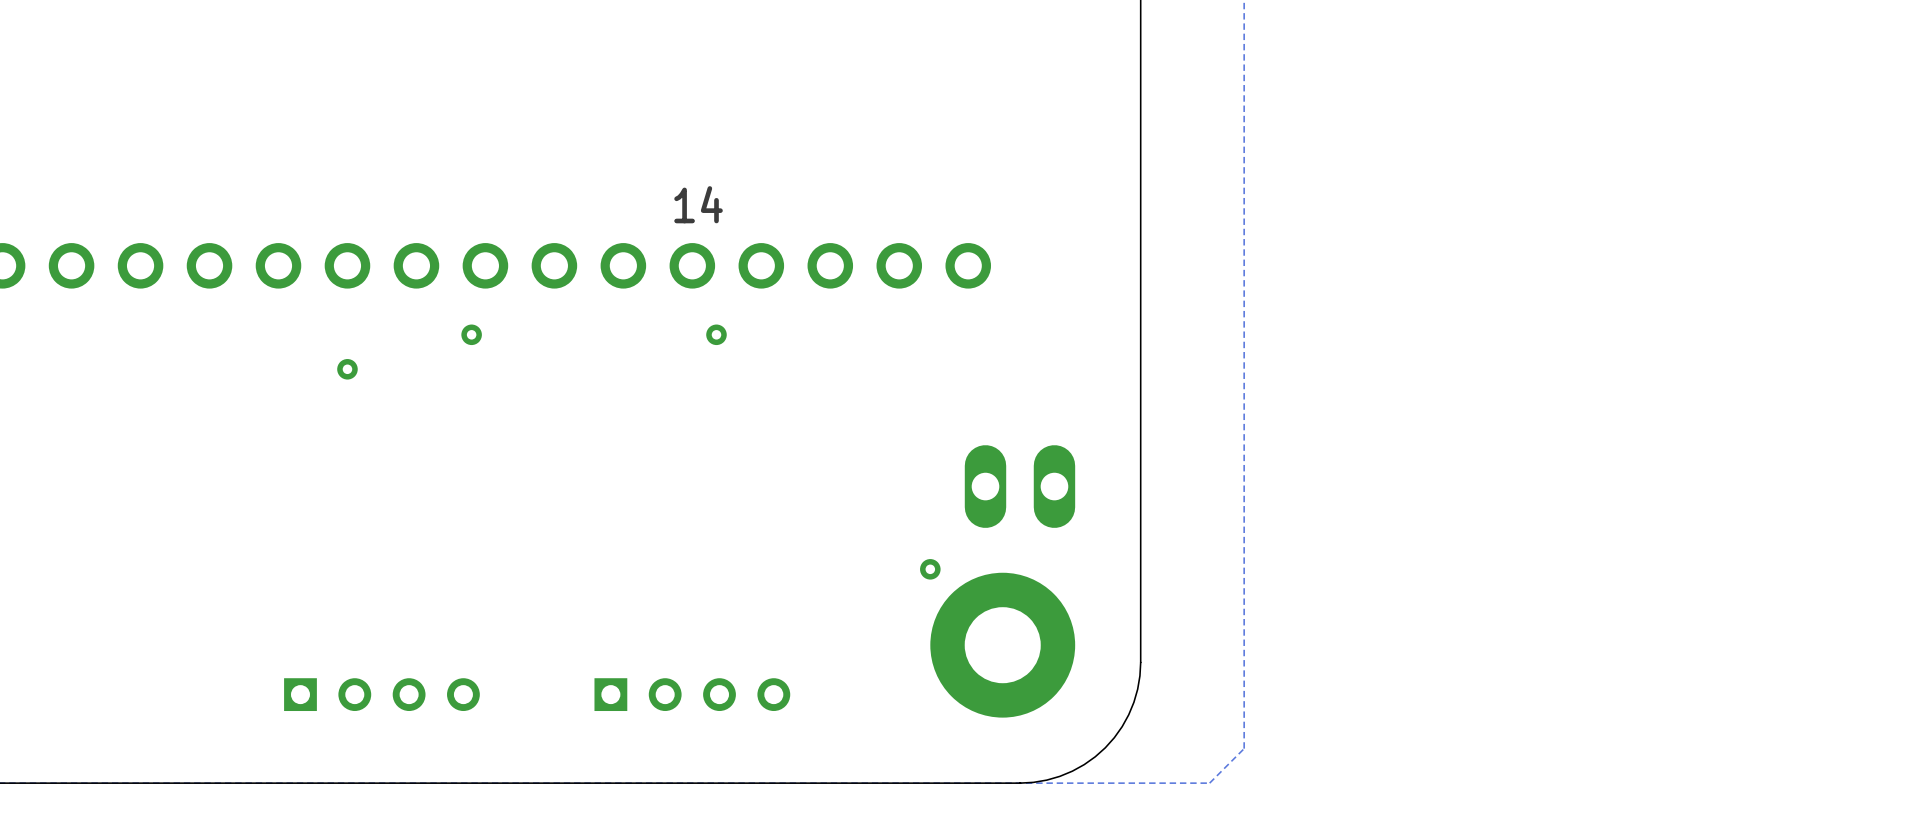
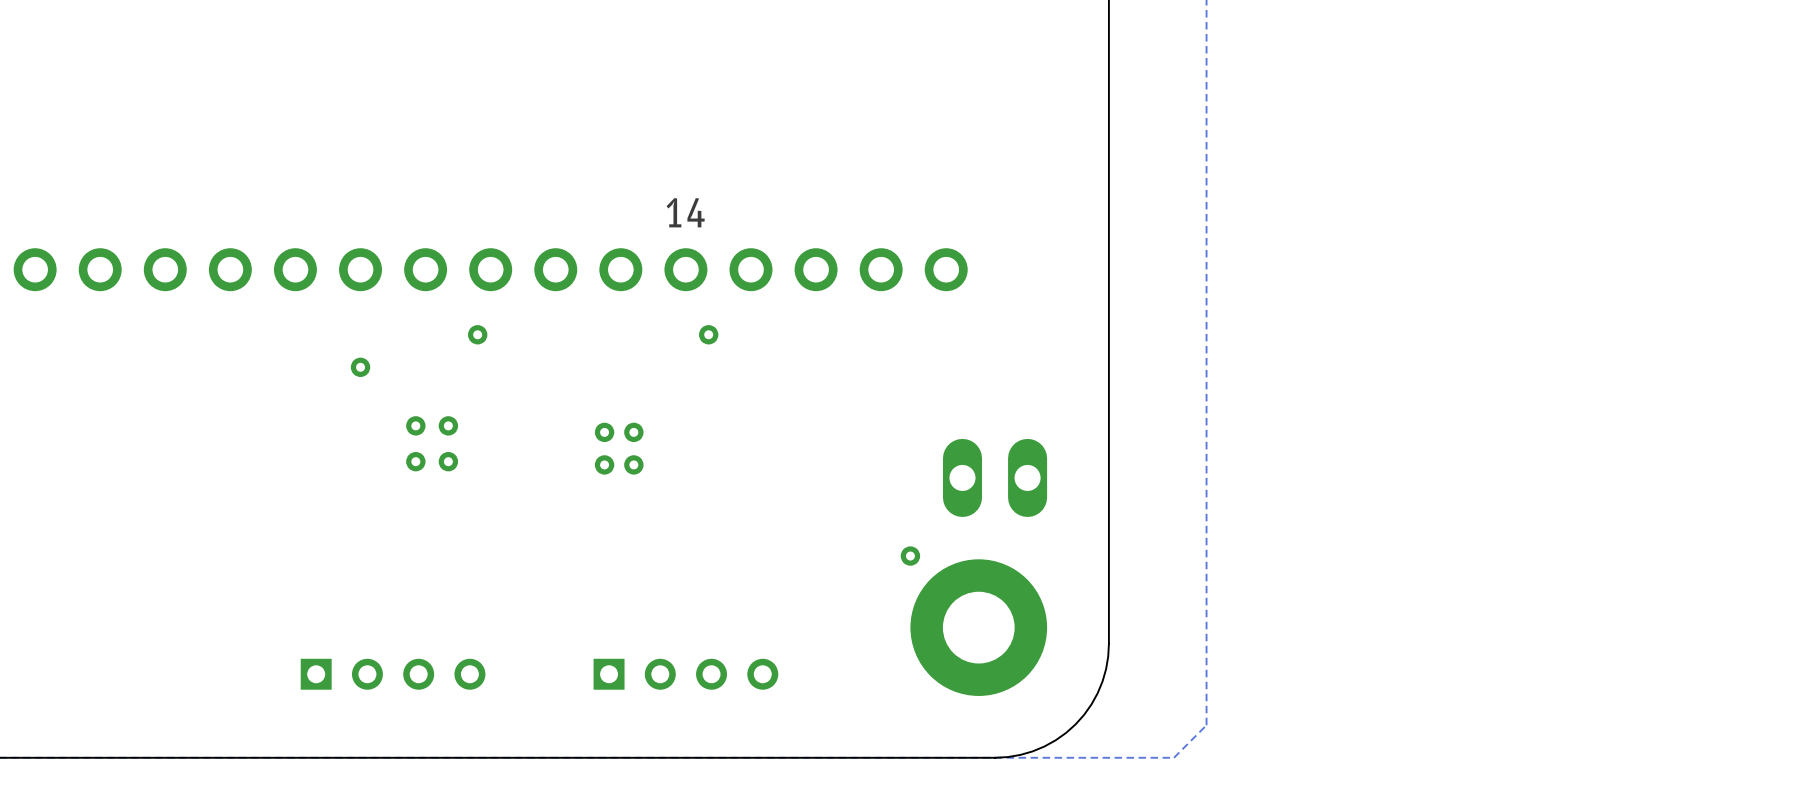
via: none -> (415, 425)
via: none -> (448, 425)
via: none -> (604, 432)
via: none -> (633, 432)
via: none -> (415, 461)
via: none -> (448, 461)
via: none -> (604, 464)
via: none -> (633, 464)

